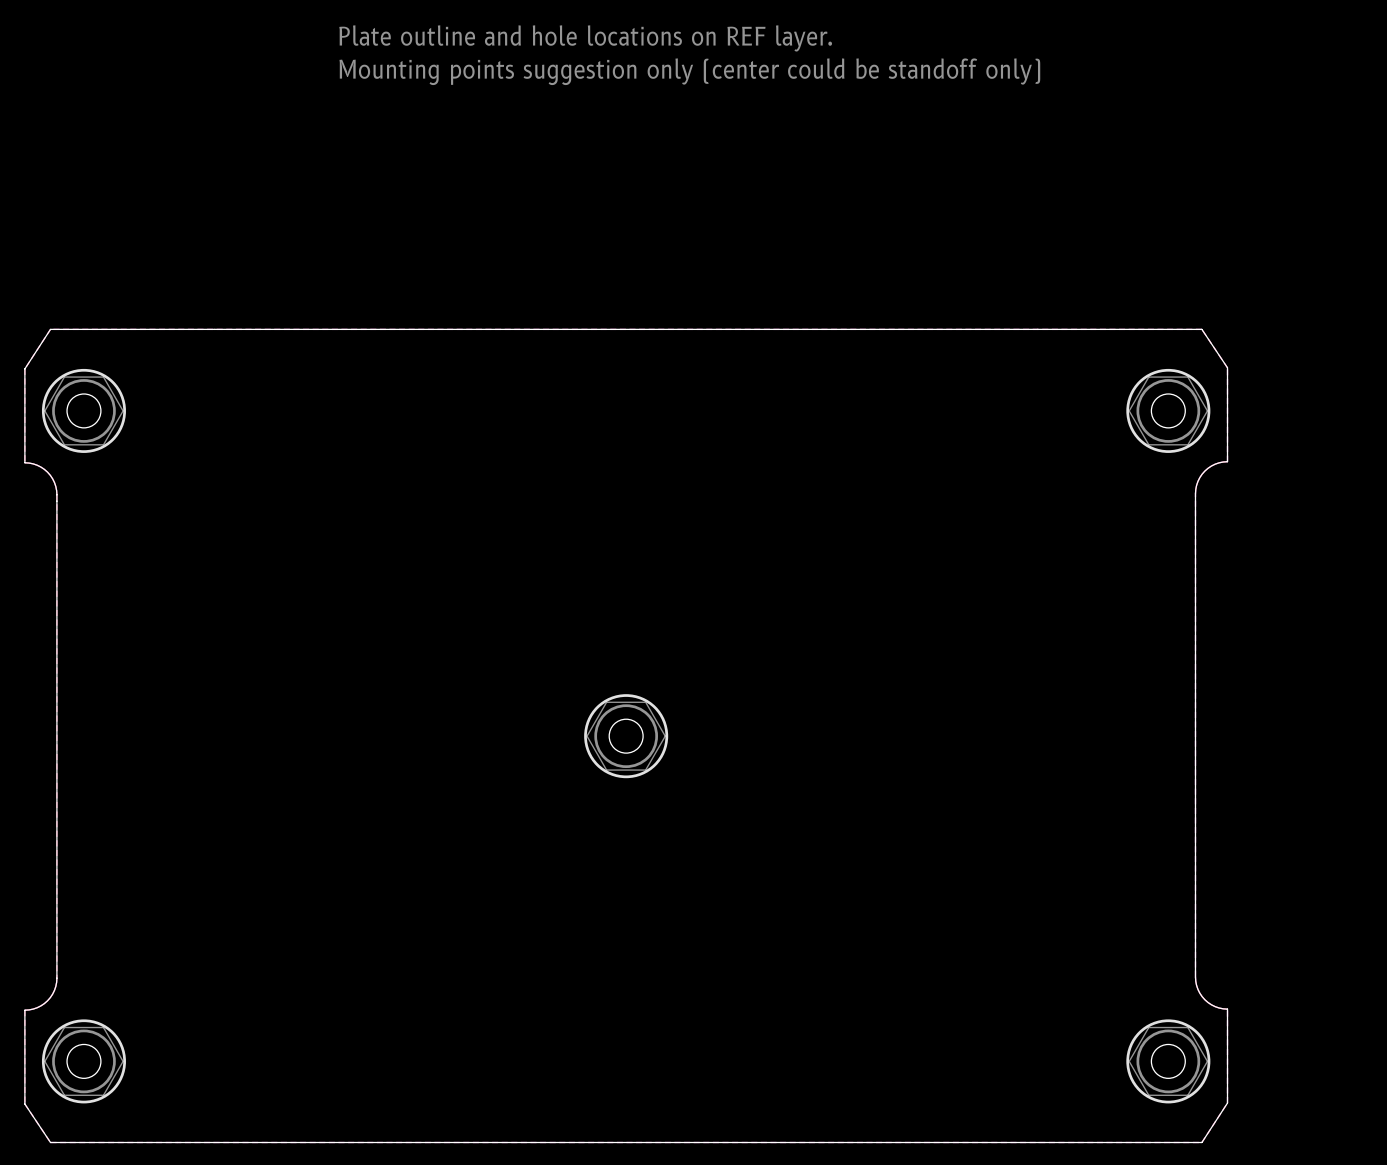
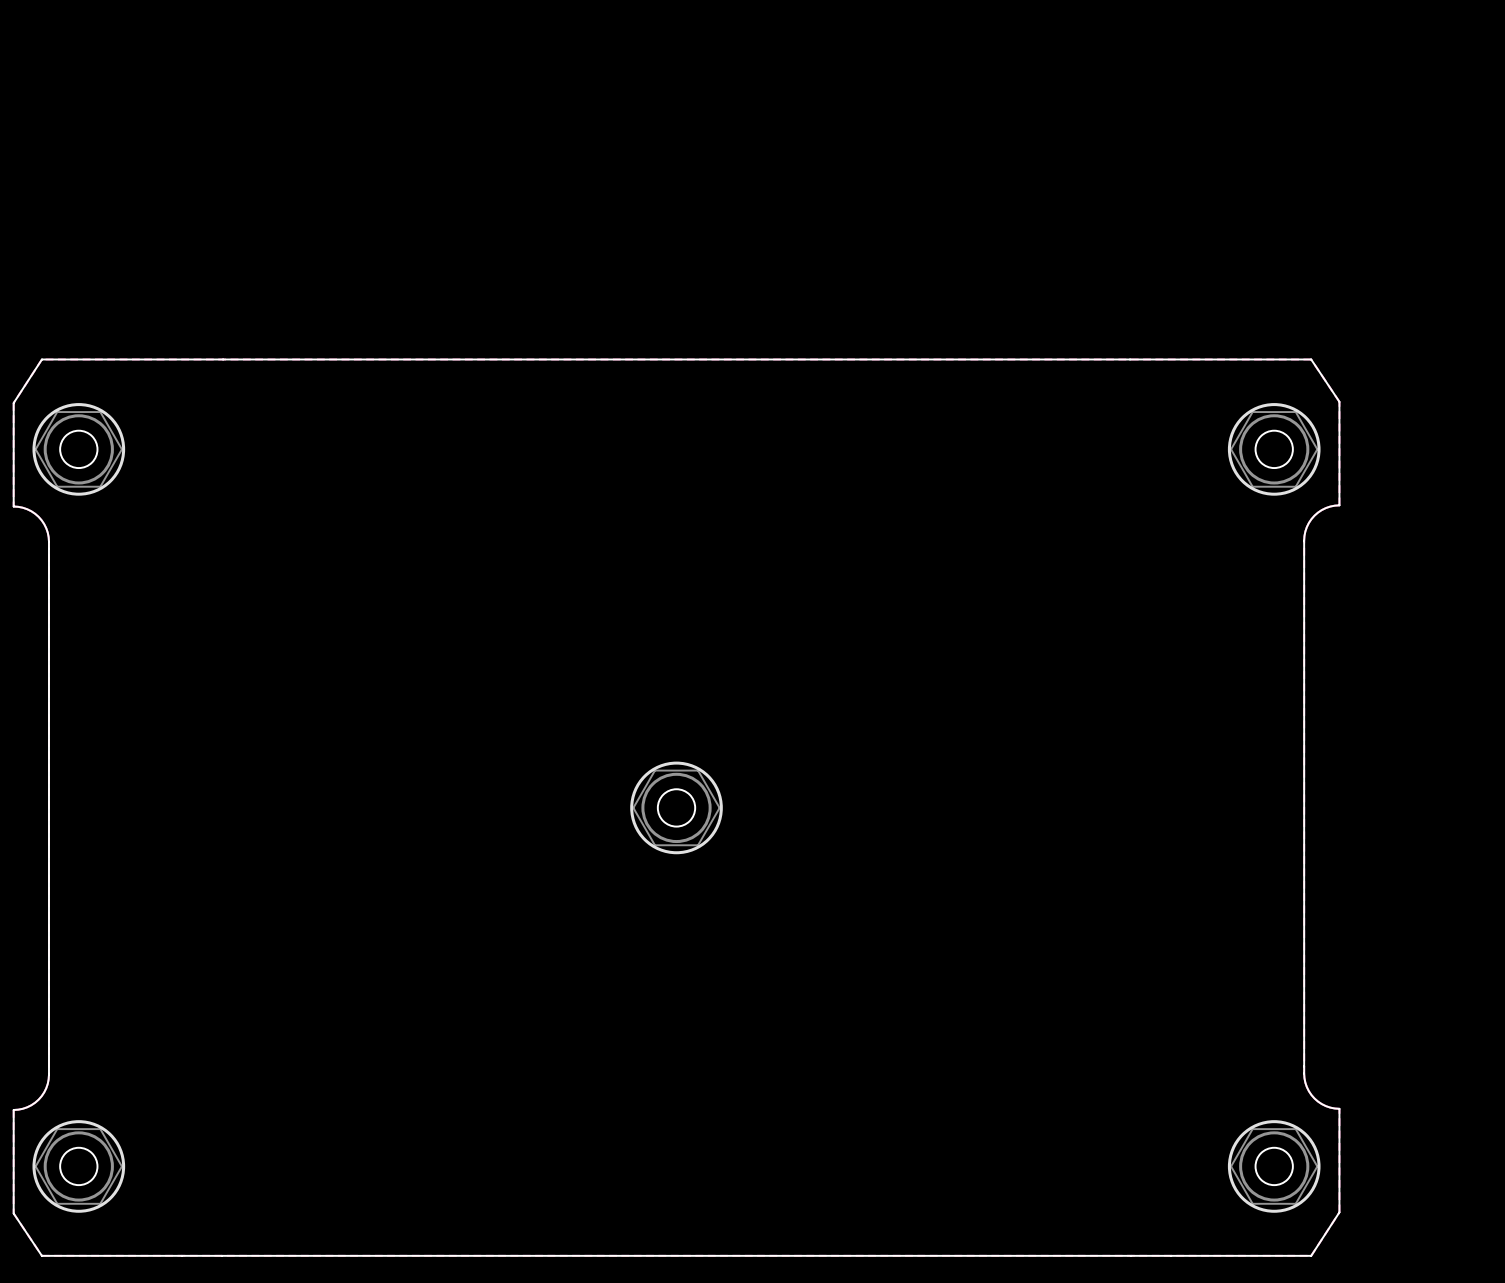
text: Plate outline and hole locations on REF layer. (585, 38) -> none
text: Mounting points suggestion only (center could be standoff only) (689, 71) -> none

